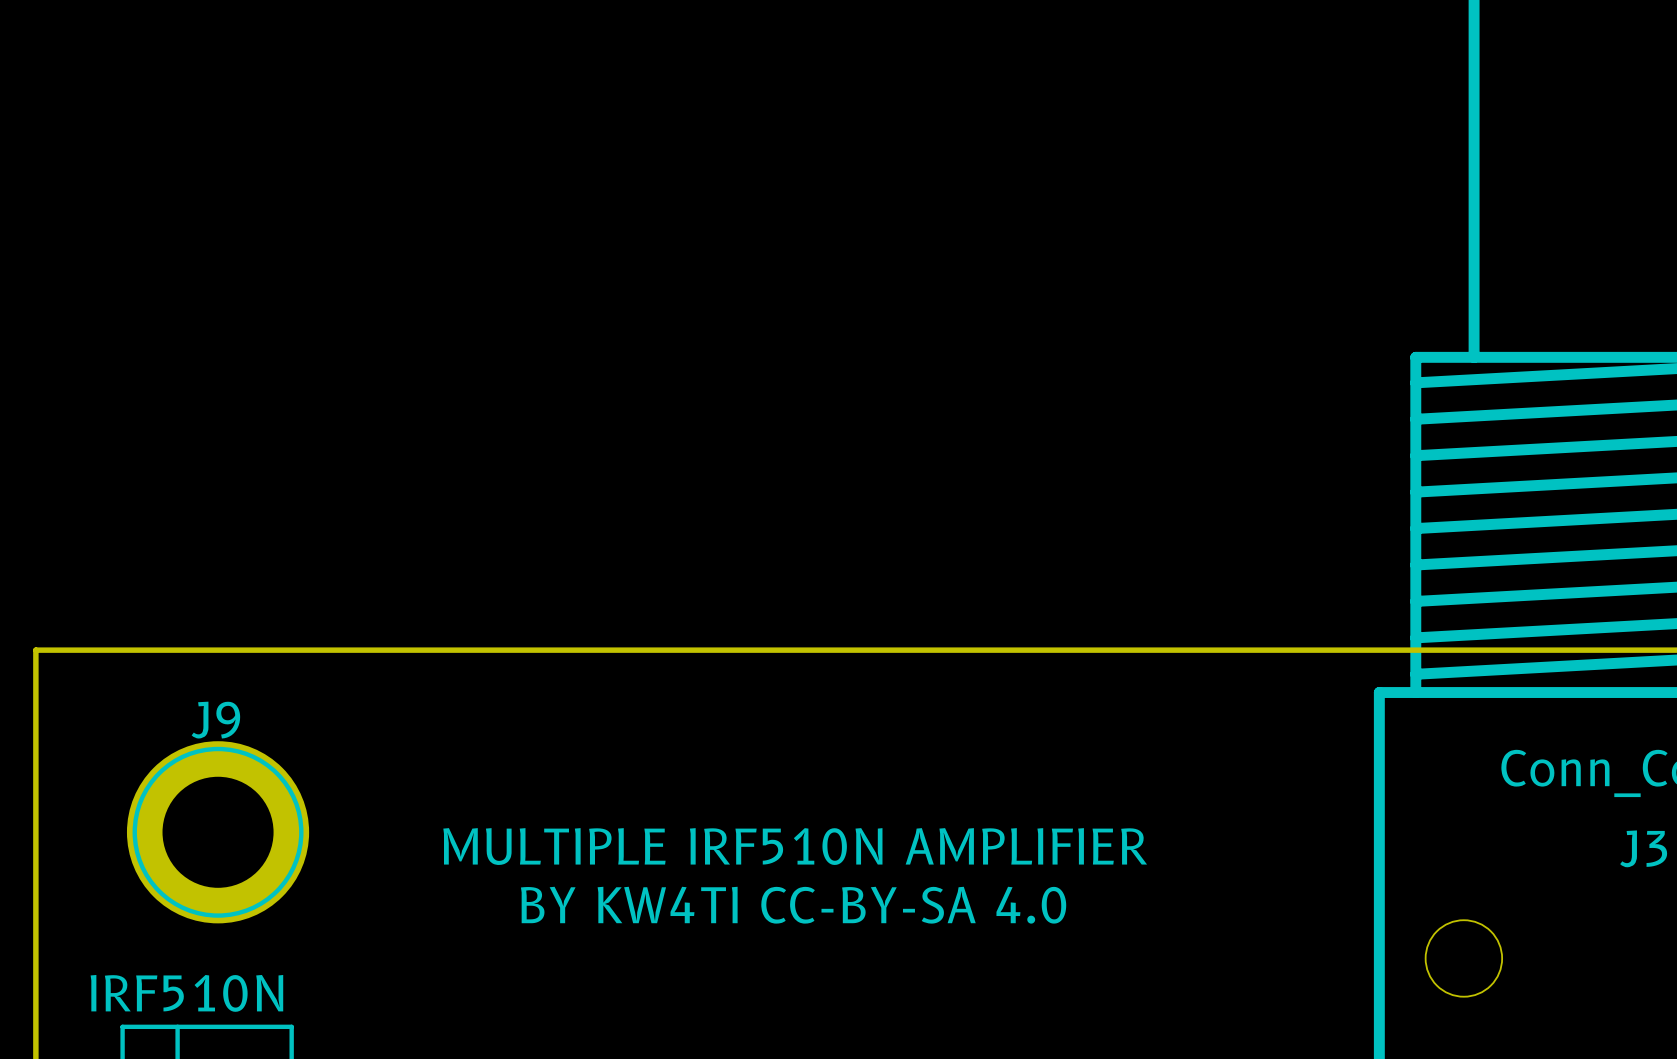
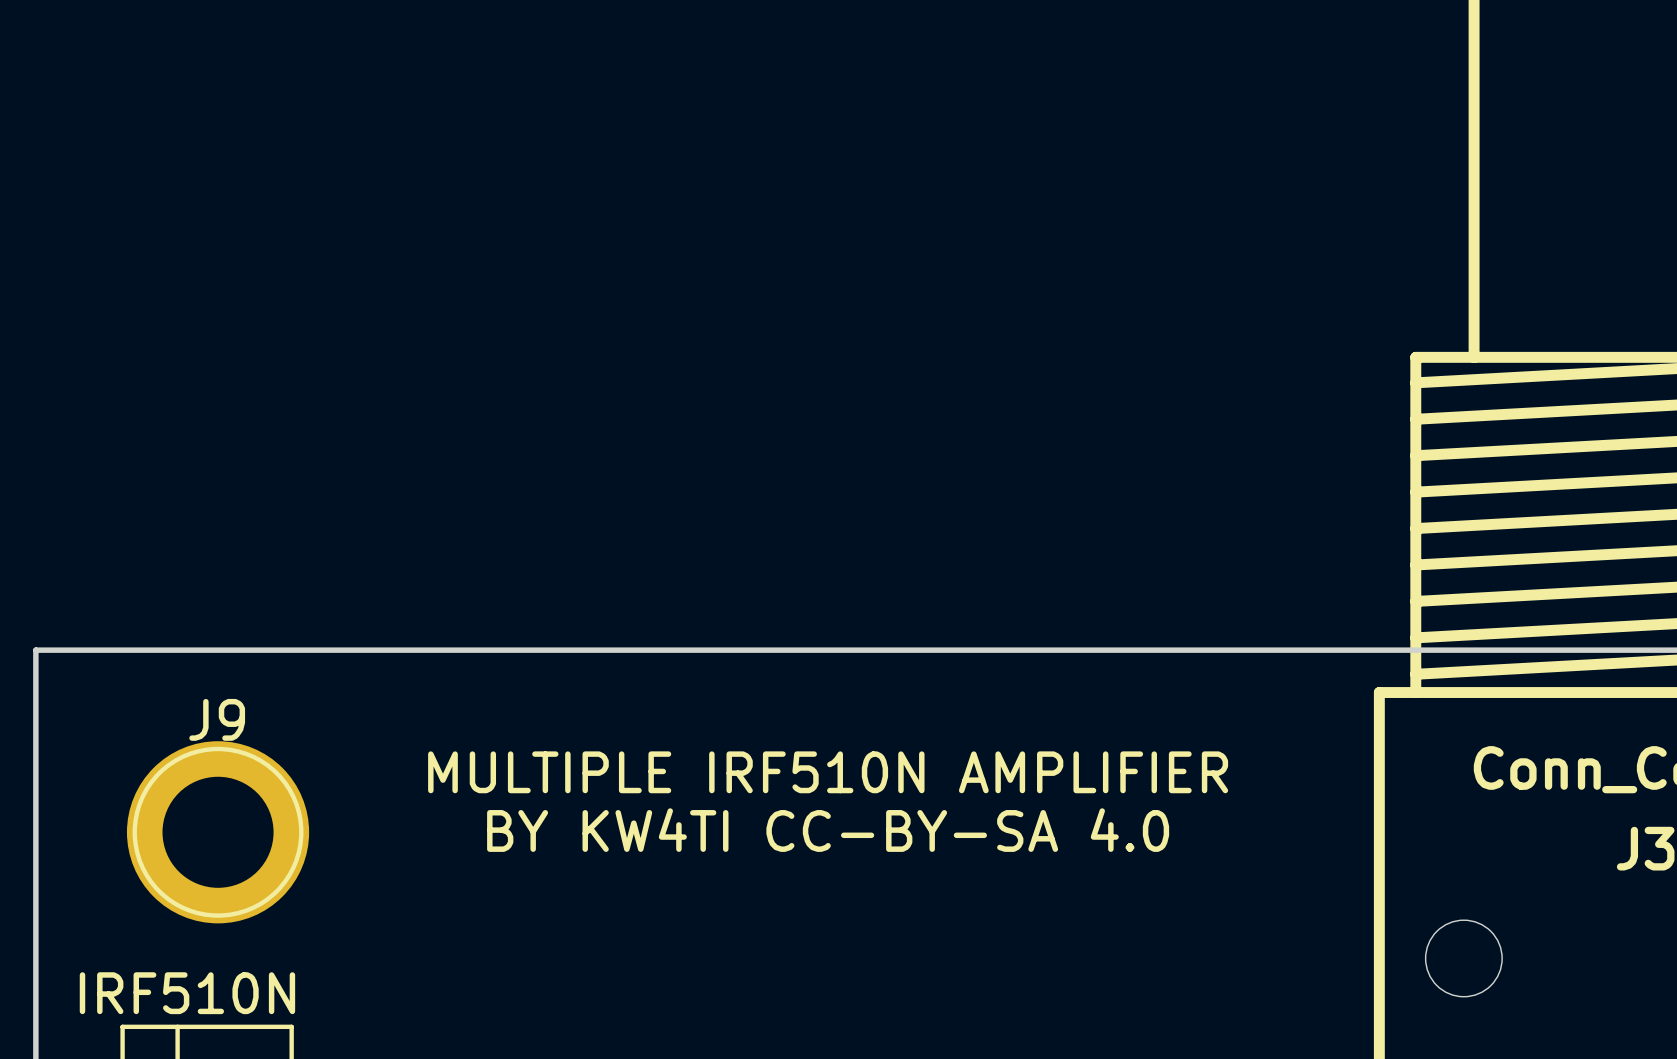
text position: MULTIPLE IRF510N AMPLIFIER (795, 846) -> MULTIPLE IRF510N AMPLIFIER (828, 772)
text position: BY KW4TI CC-BY-SA 4.0 (793, 905) -> BY KW4TI CC-BY-SA 4.0 (828, 830)

